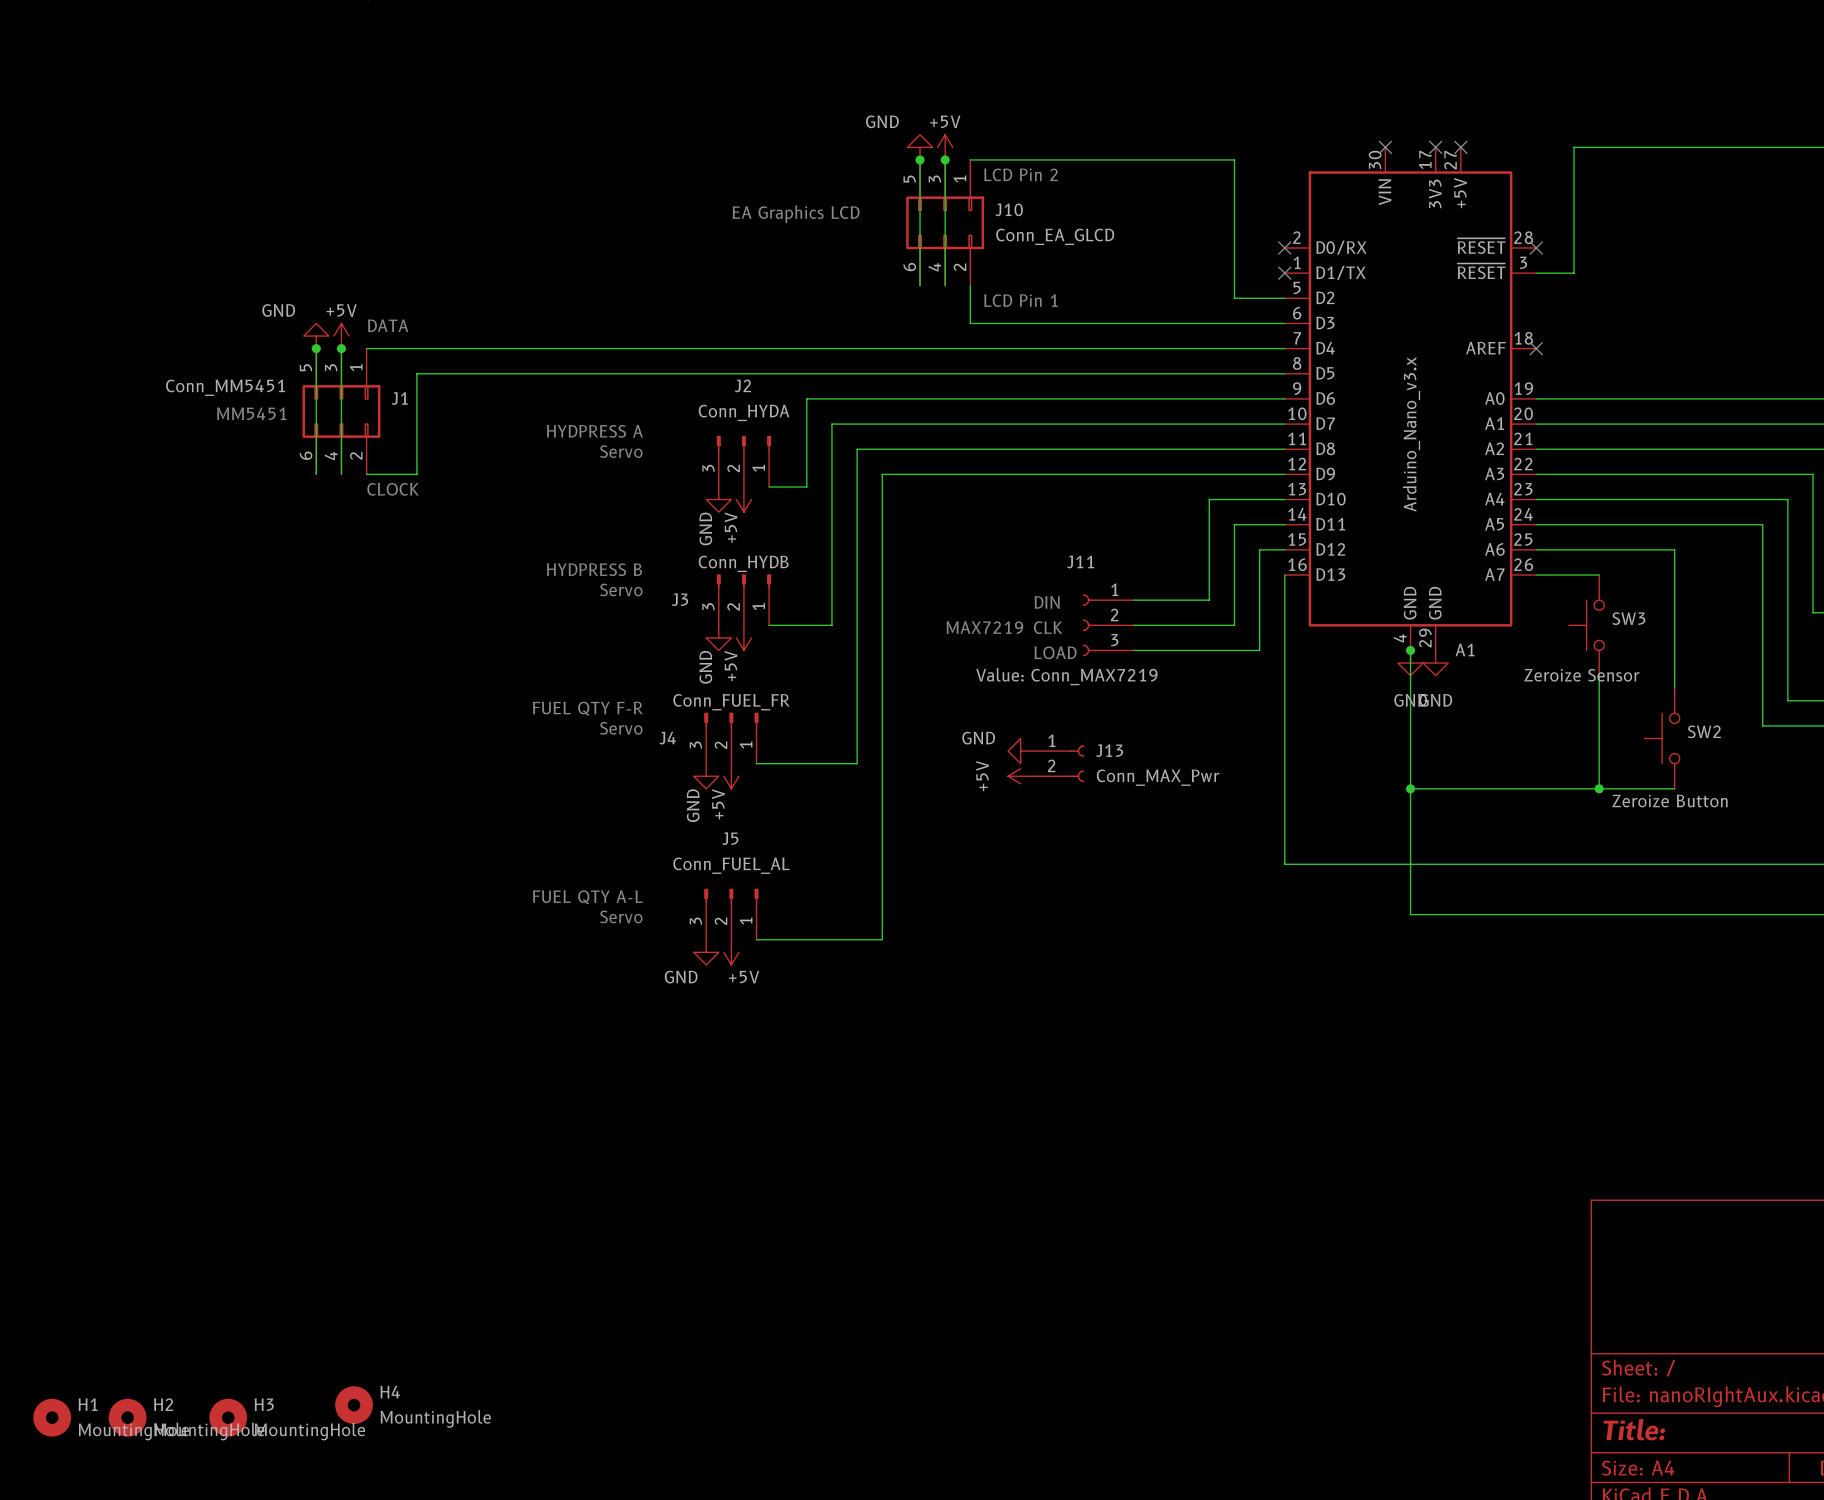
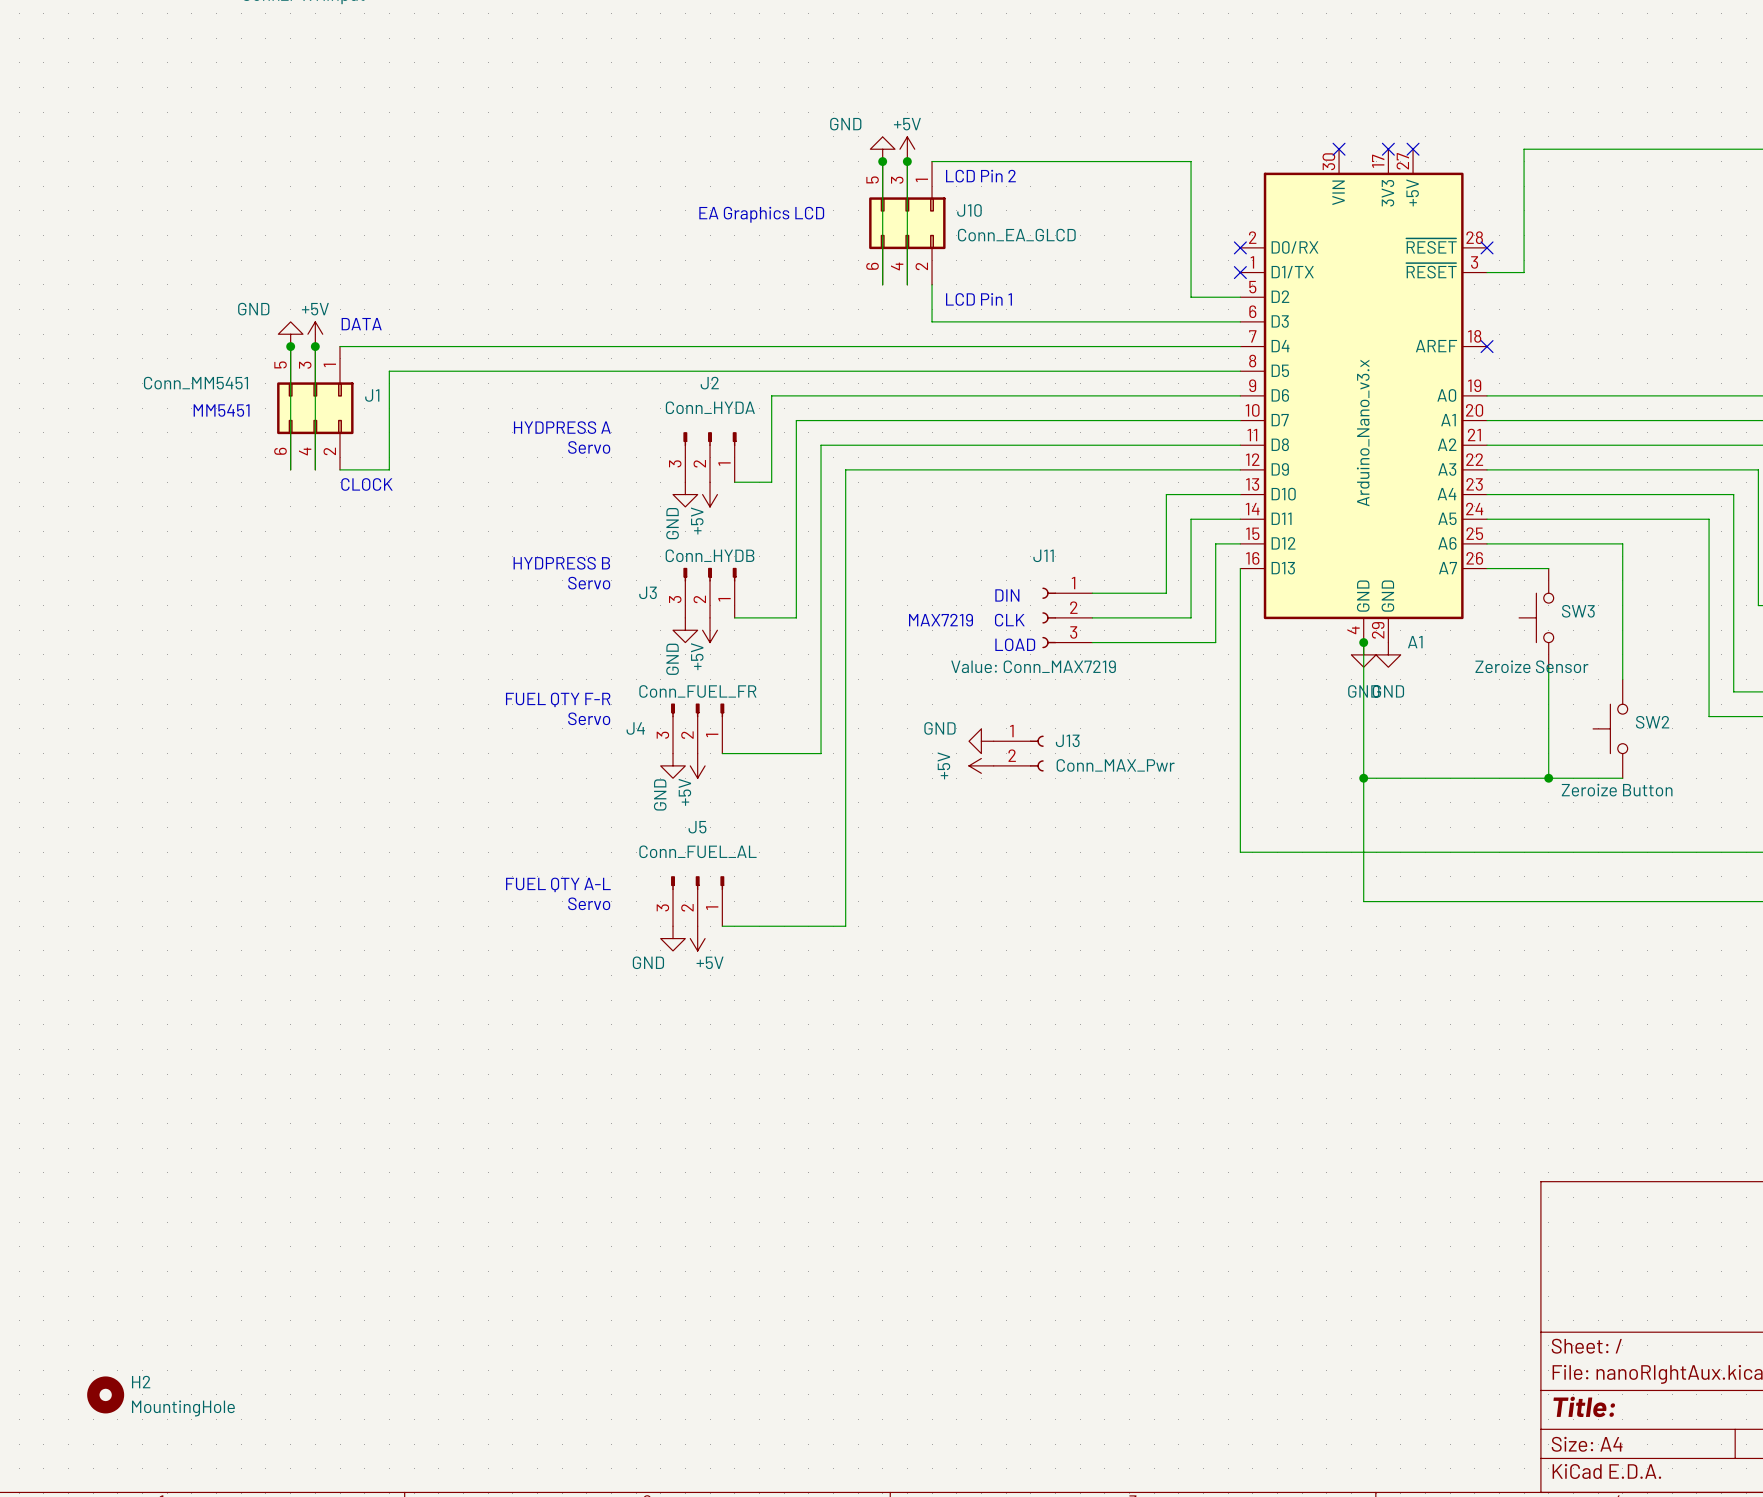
H4: MountingHole (354, 1405) -> none
H1: MountingHole (52, 1417) -> none
H3: MountingHole (228, 1417) -> none

